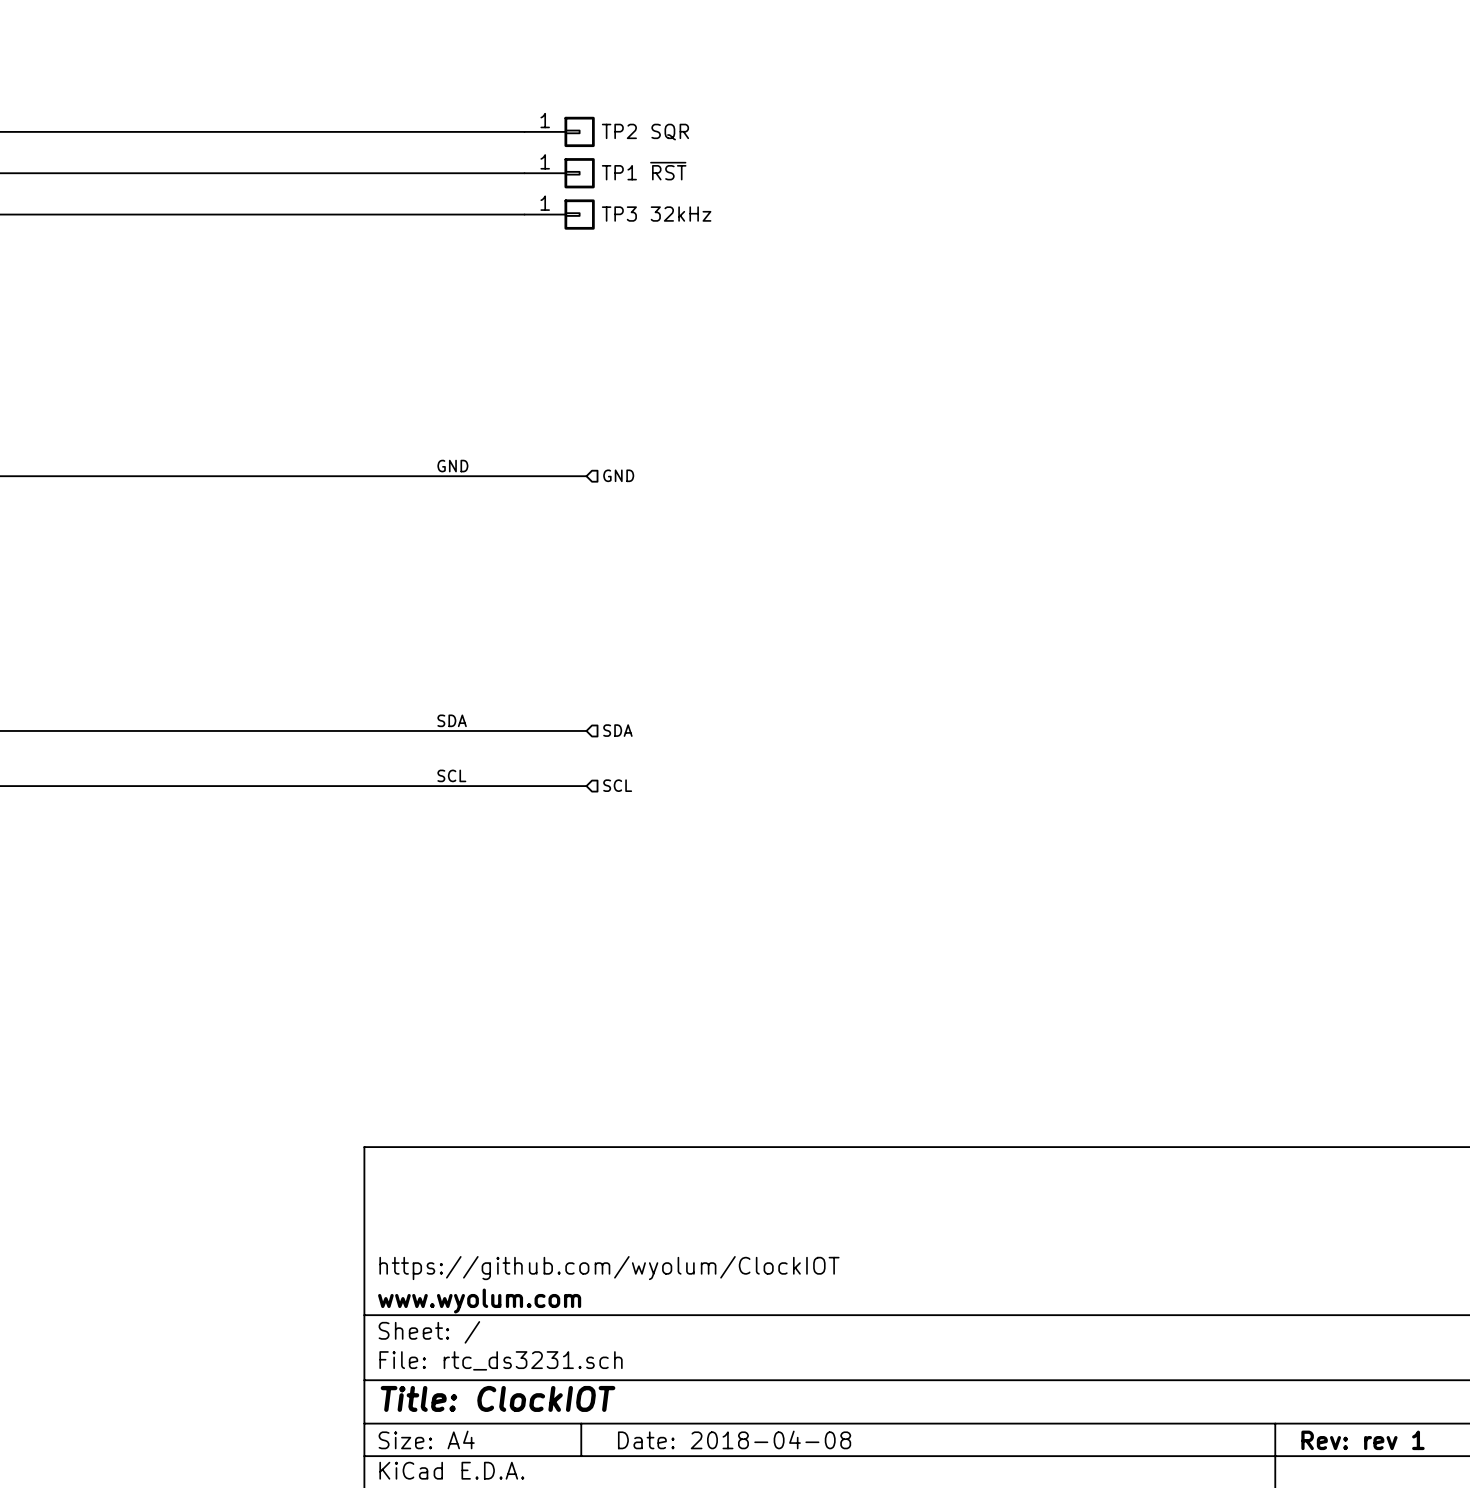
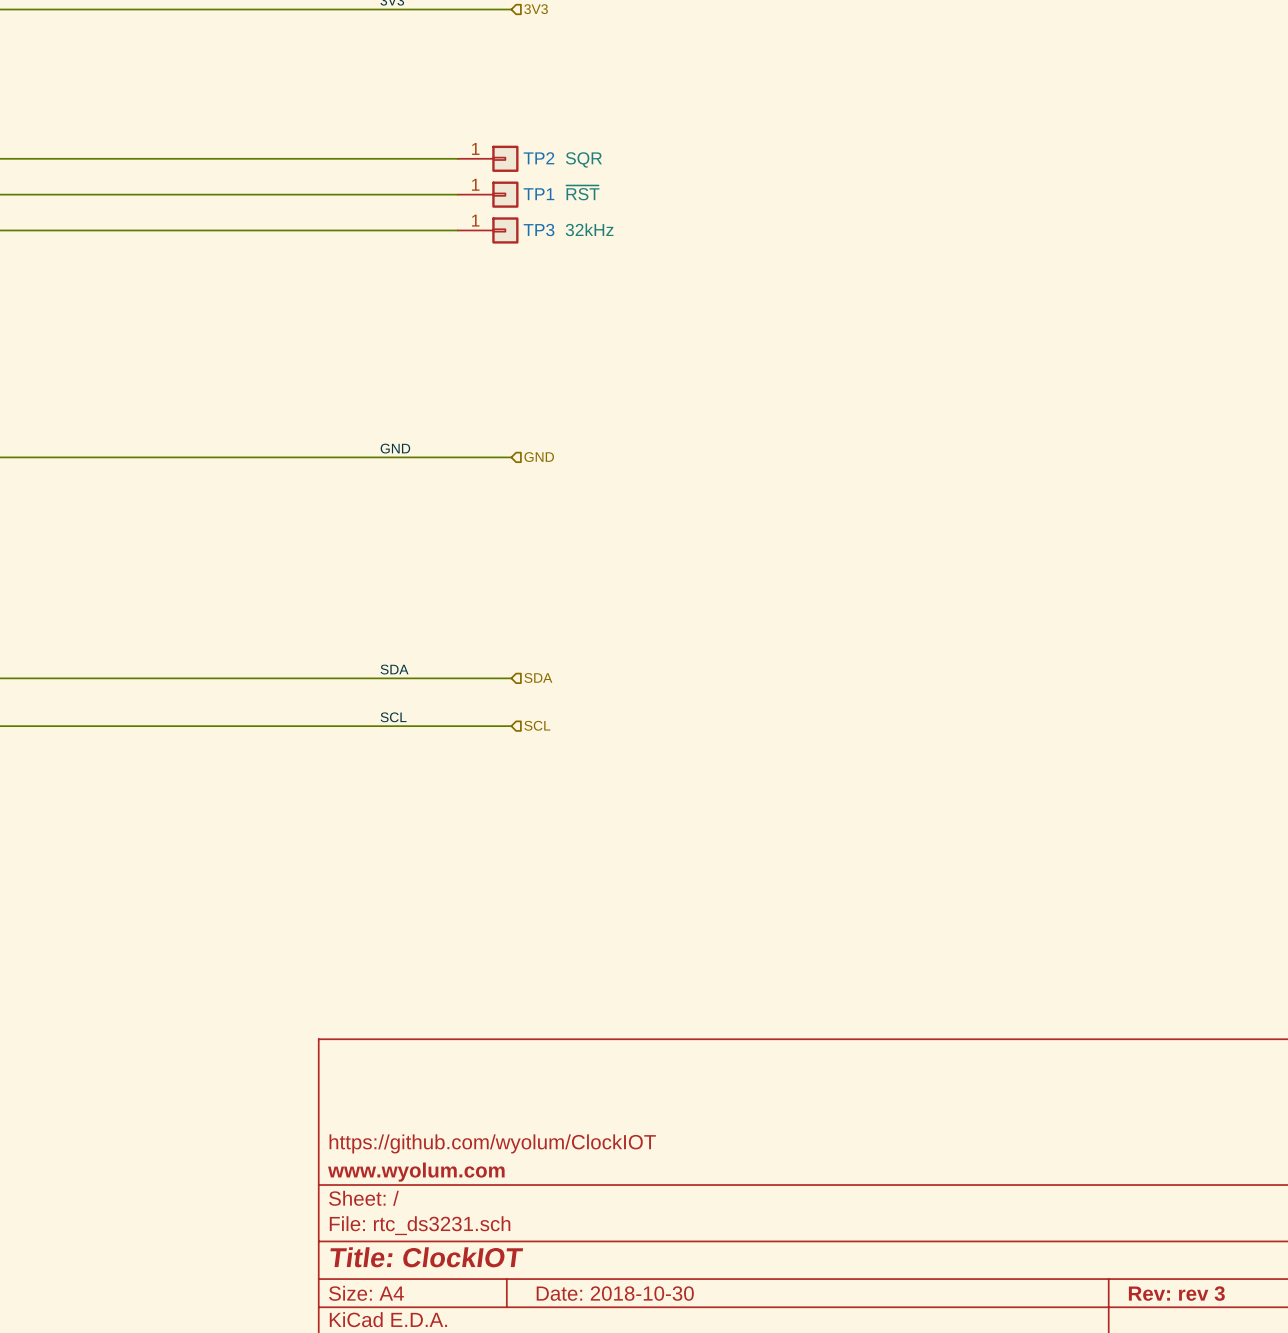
title block: Date: 2018-04-08 (734, 1439) -> Date: 2018-10-30 (615, 1293)
title block: Rev: rev 1 (1363, 1440) -> Rev: rev 3 (1176, 1293)

